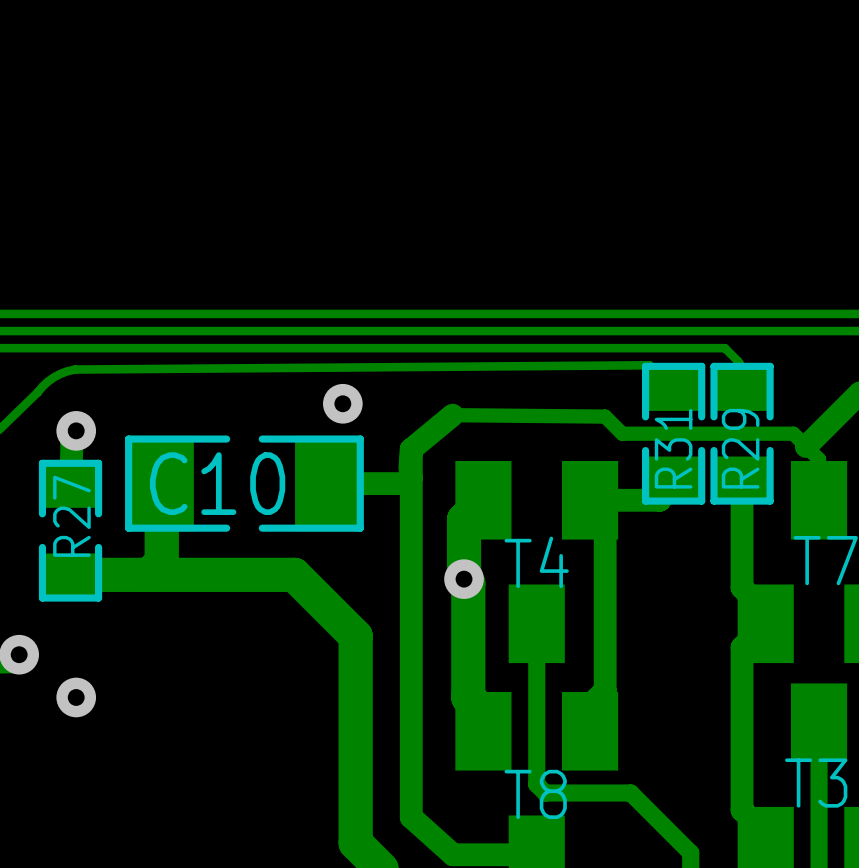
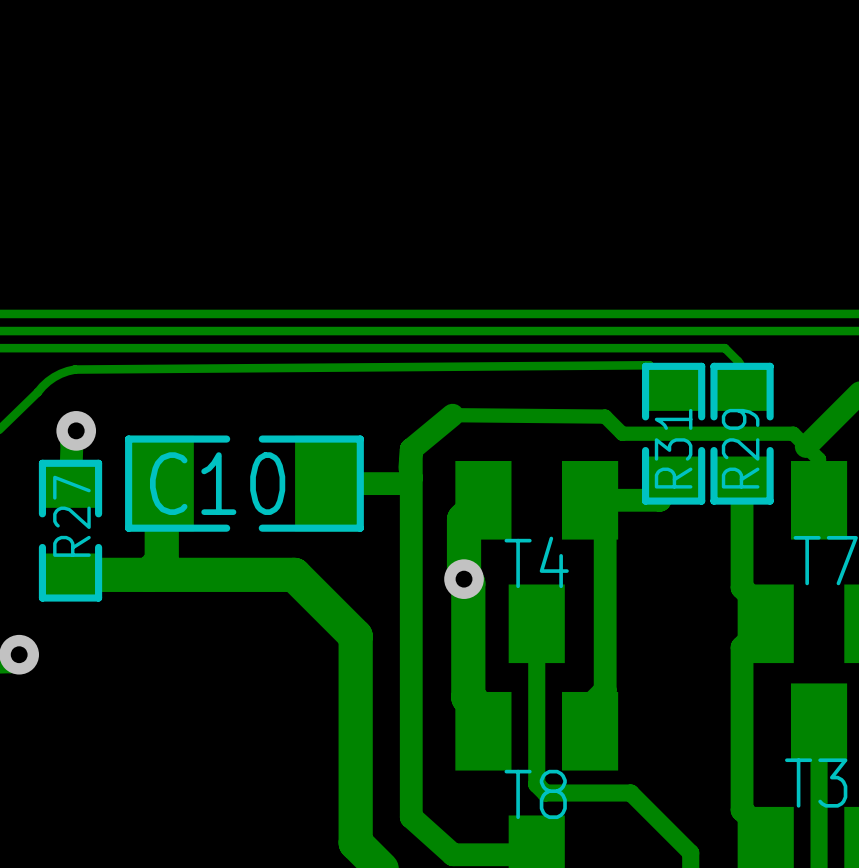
via: (342, 403) -> none
via: (76, 697) -> none

